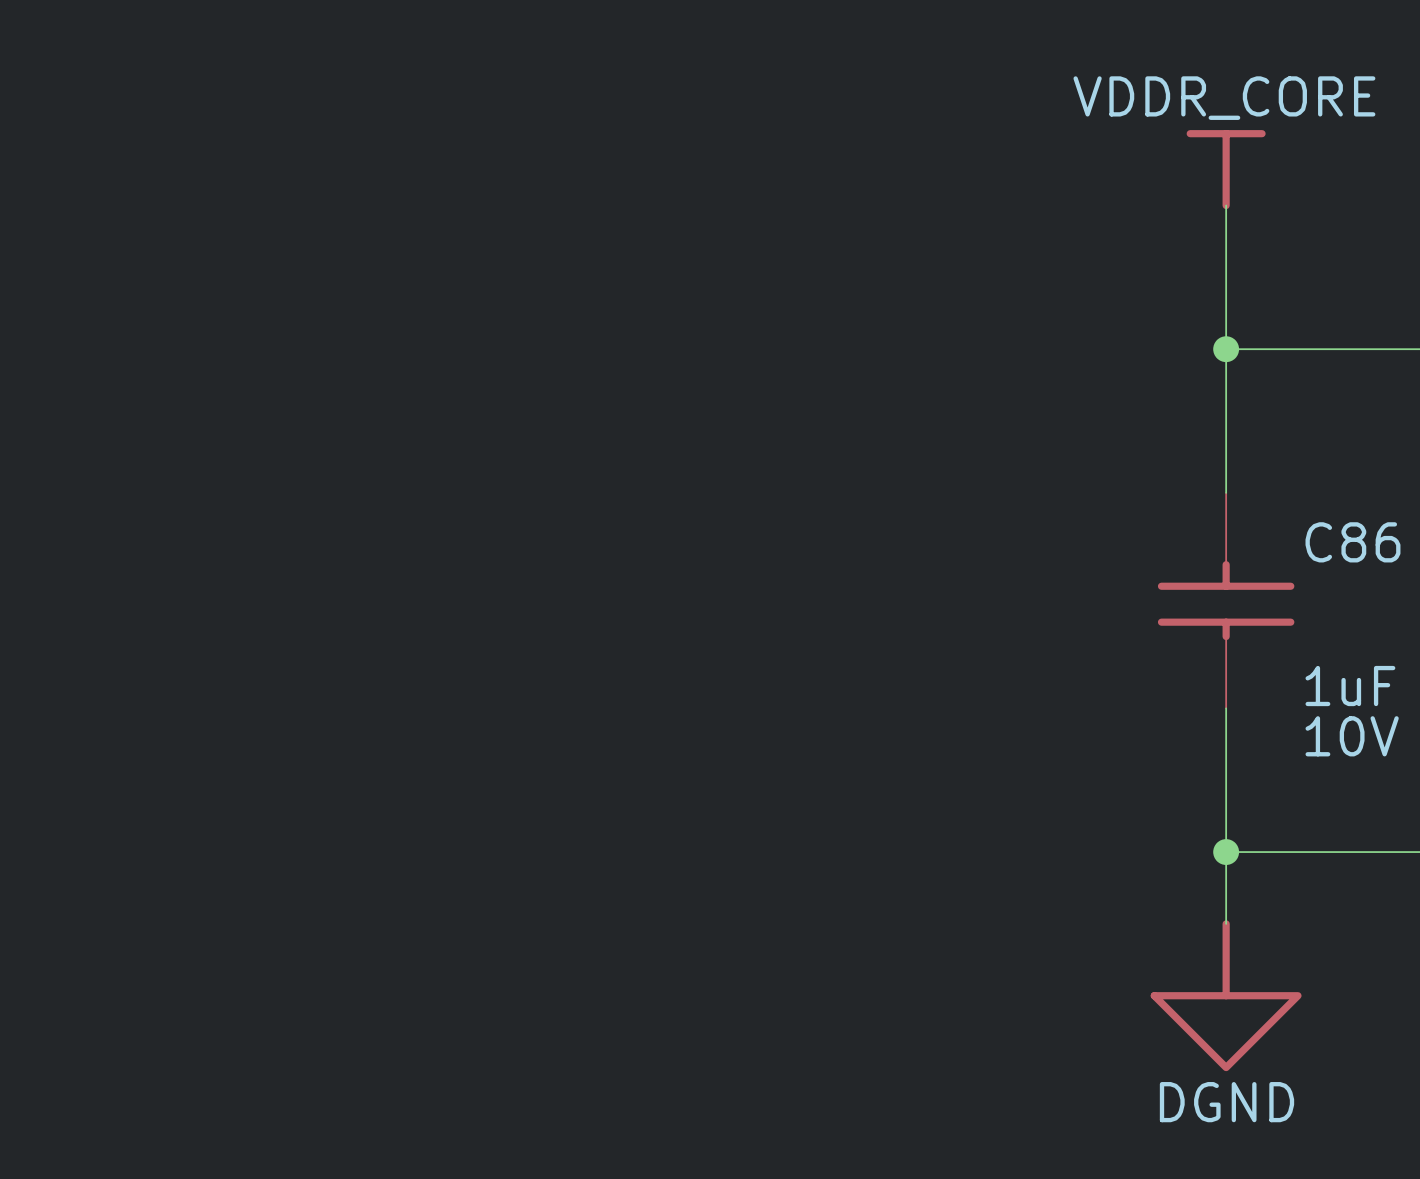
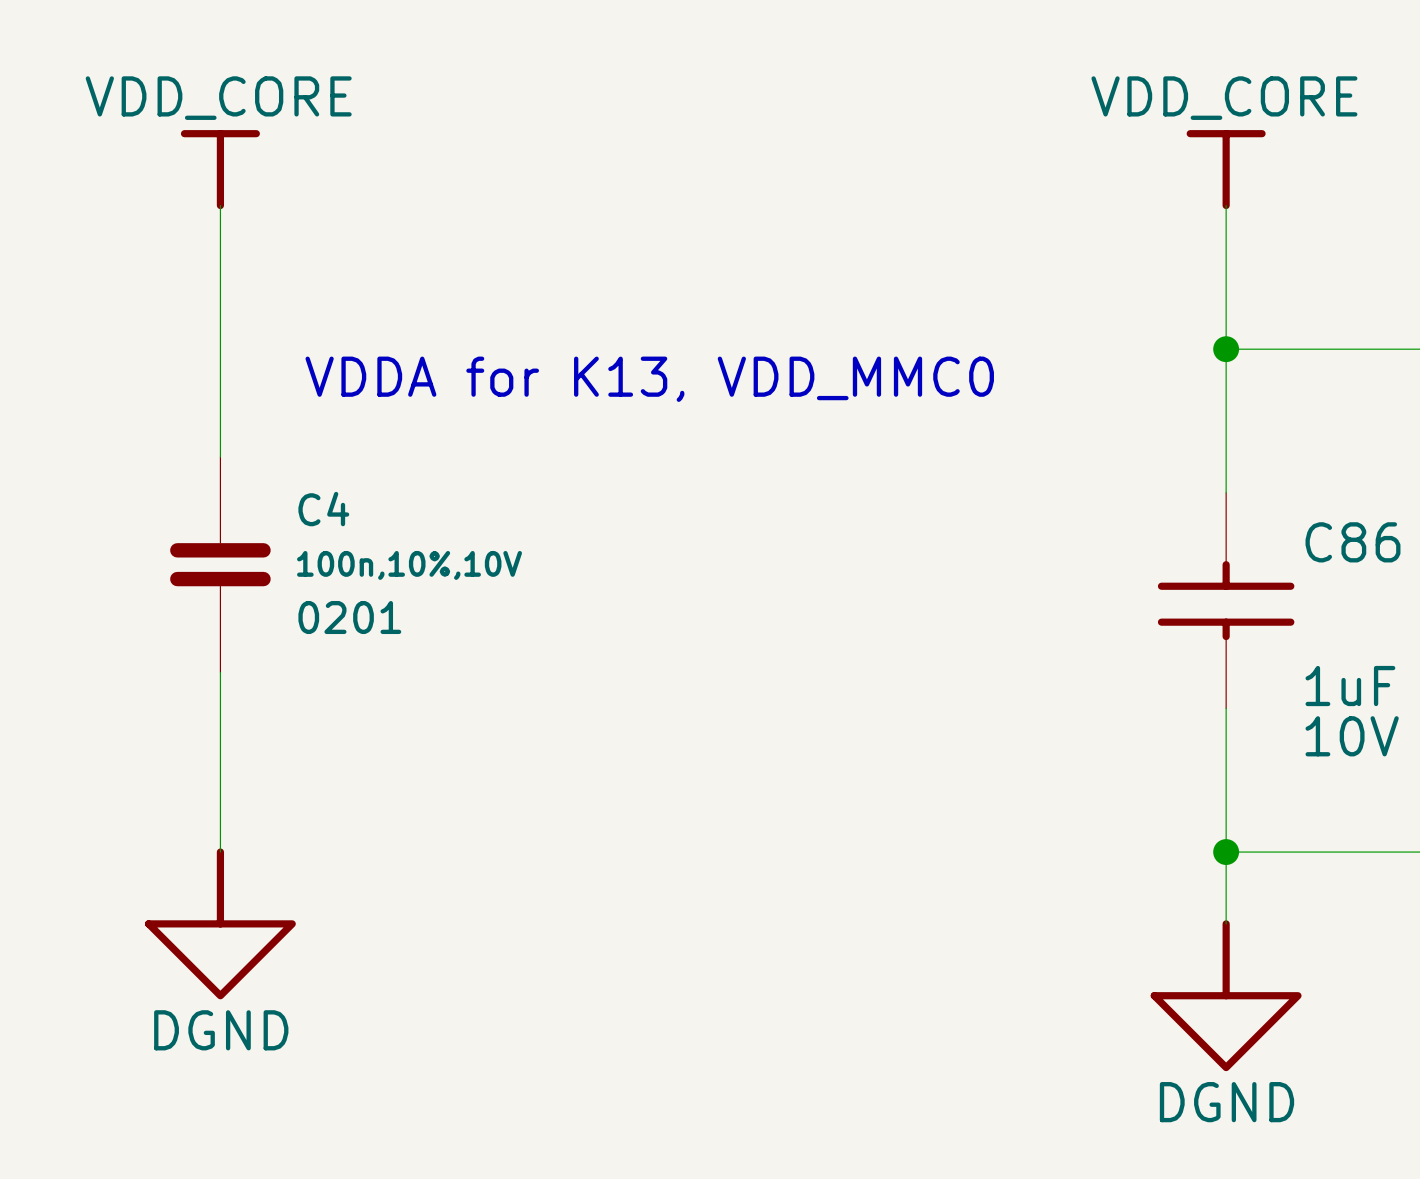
power symbol: none -> VDD_CORE (220, 169)
power symbol: VDDR_CORE (1226, 169) -> VDD_CORE (1226, 169)
wire: none -> (220, 205) (220, 456)
text: none -> VDDA for K13, VDD_MMC0 (649, 379)
C4: none -> 100n,10%,10V (220, 564)
wire: none -> (220, 672) (220, 852)
power symbol: none -> DGND (220, 923)

